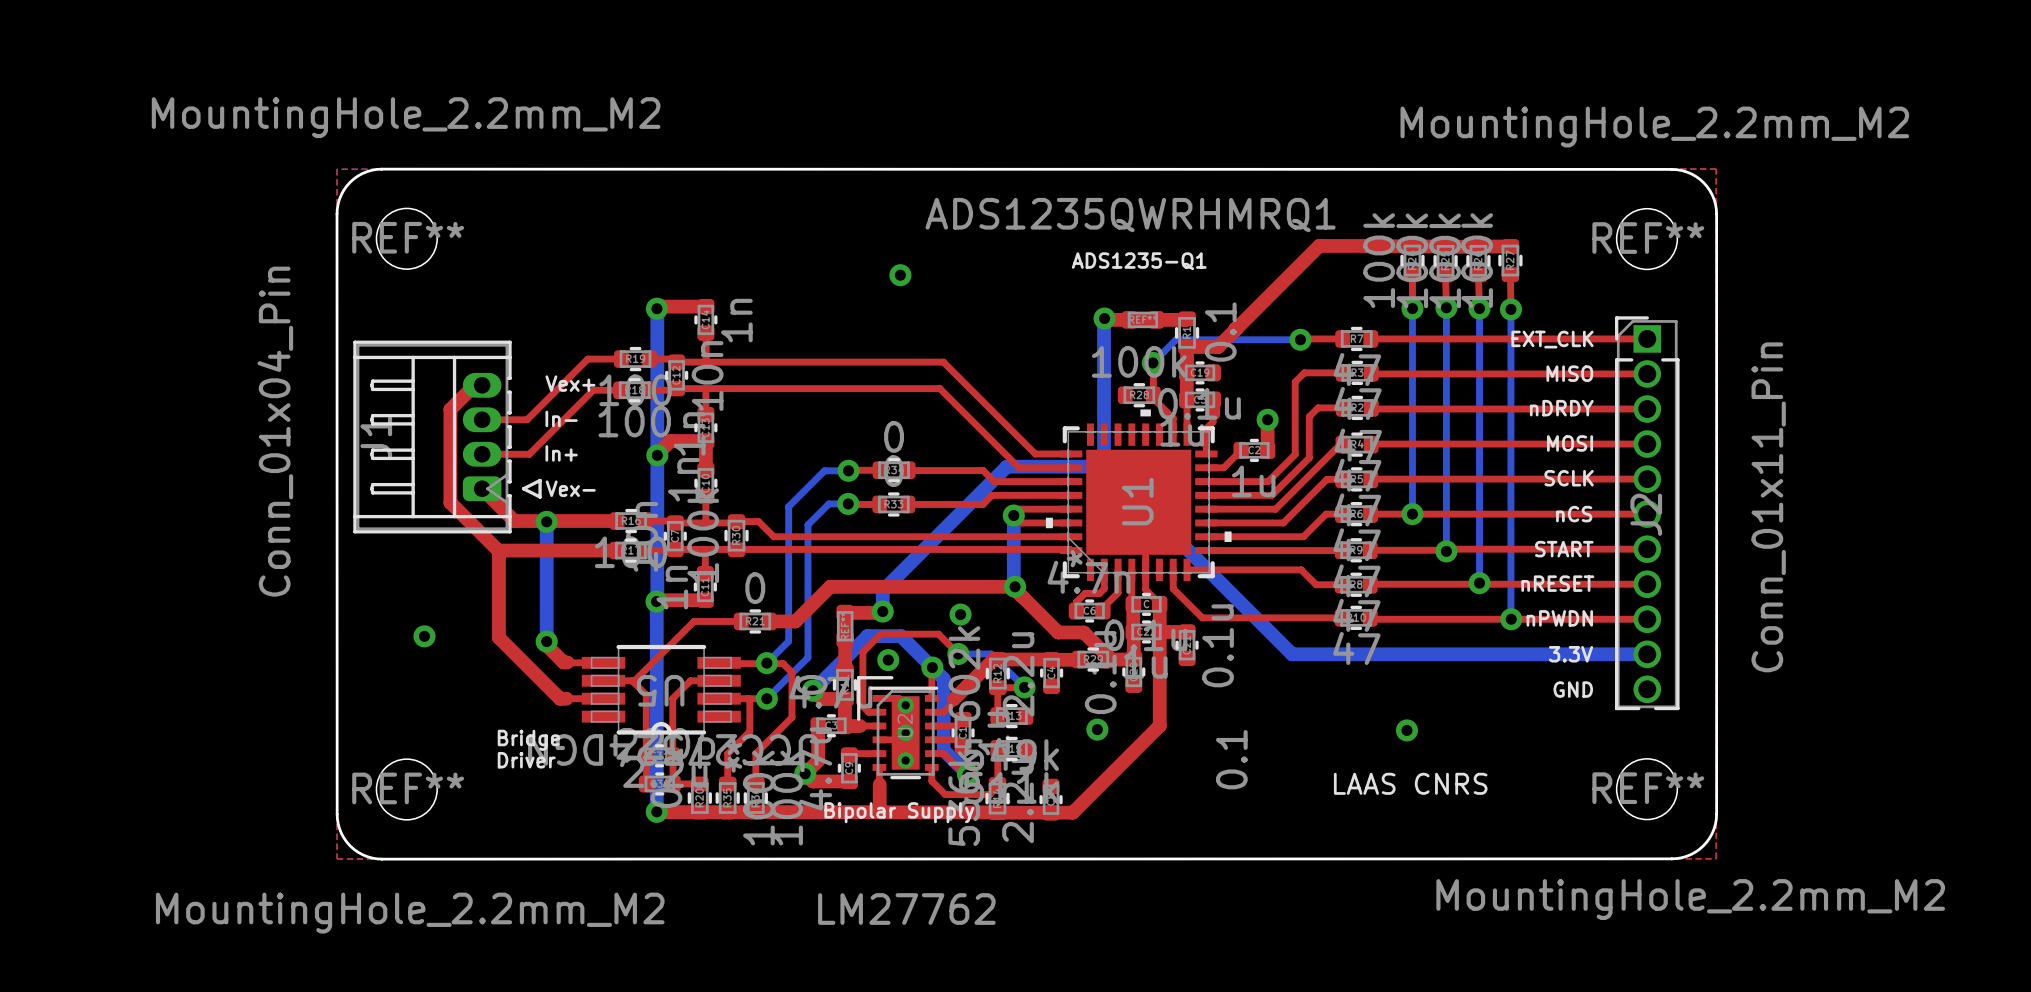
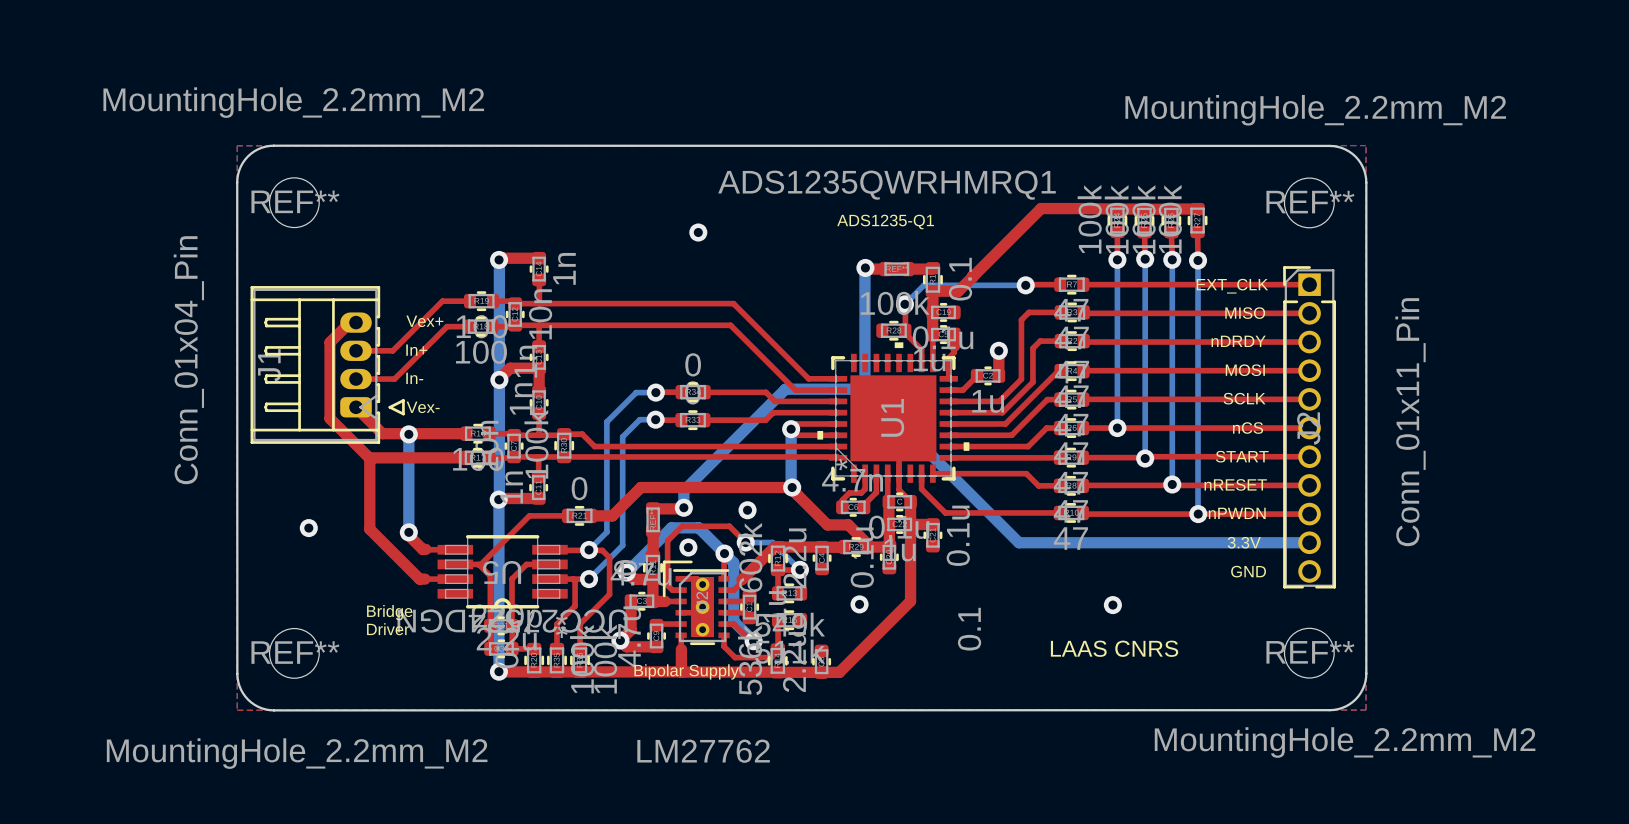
text: In- (561, 418) -> In+ (416, 350)
text: In+ (561, 453) -> In- (414, 378)

